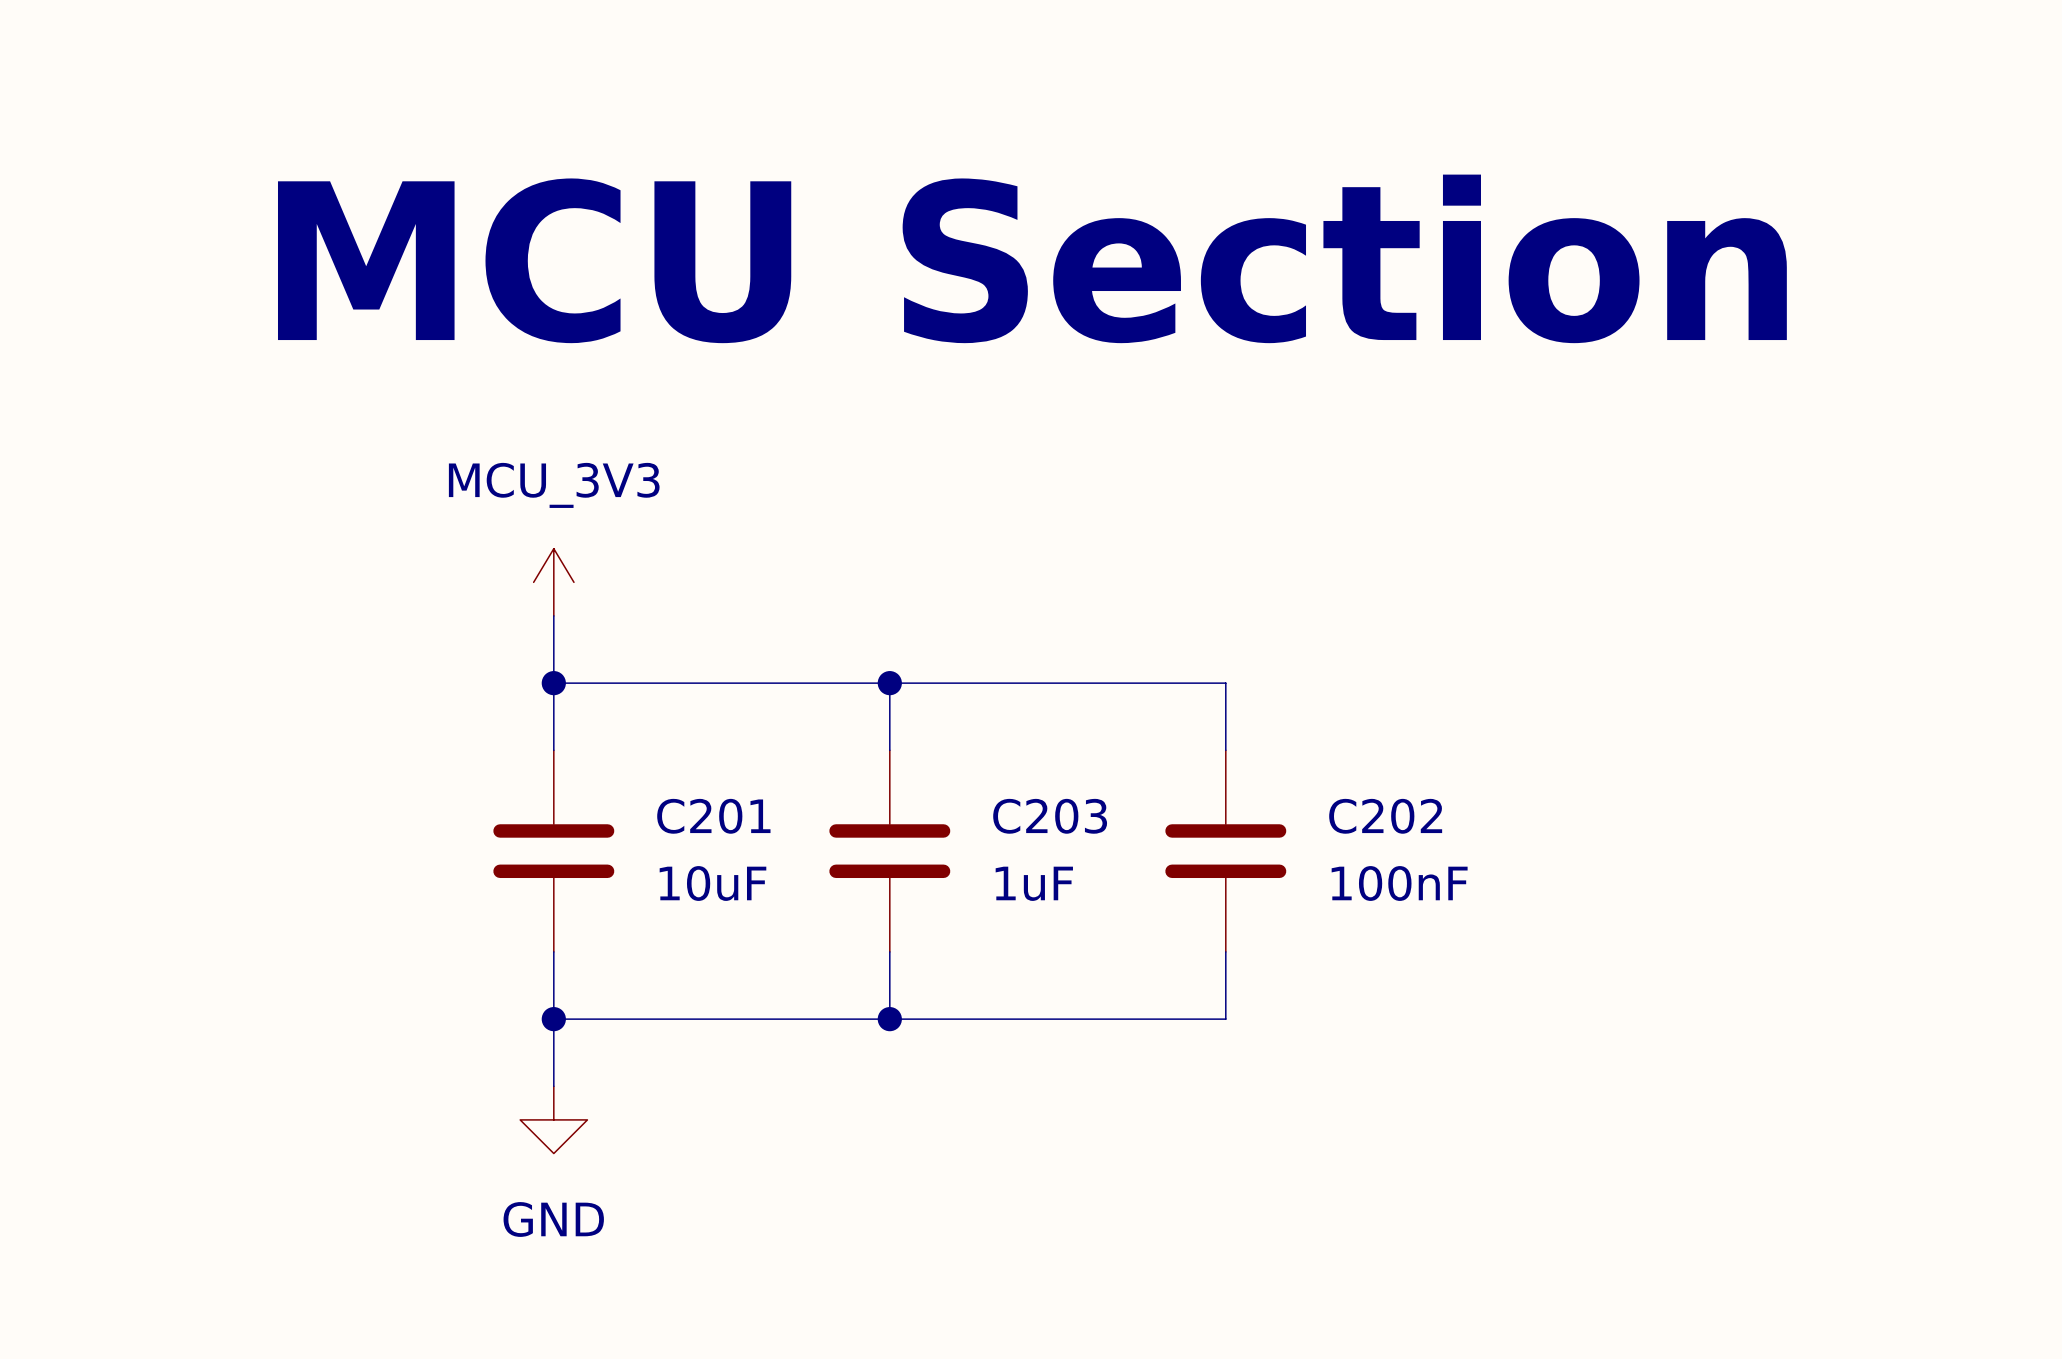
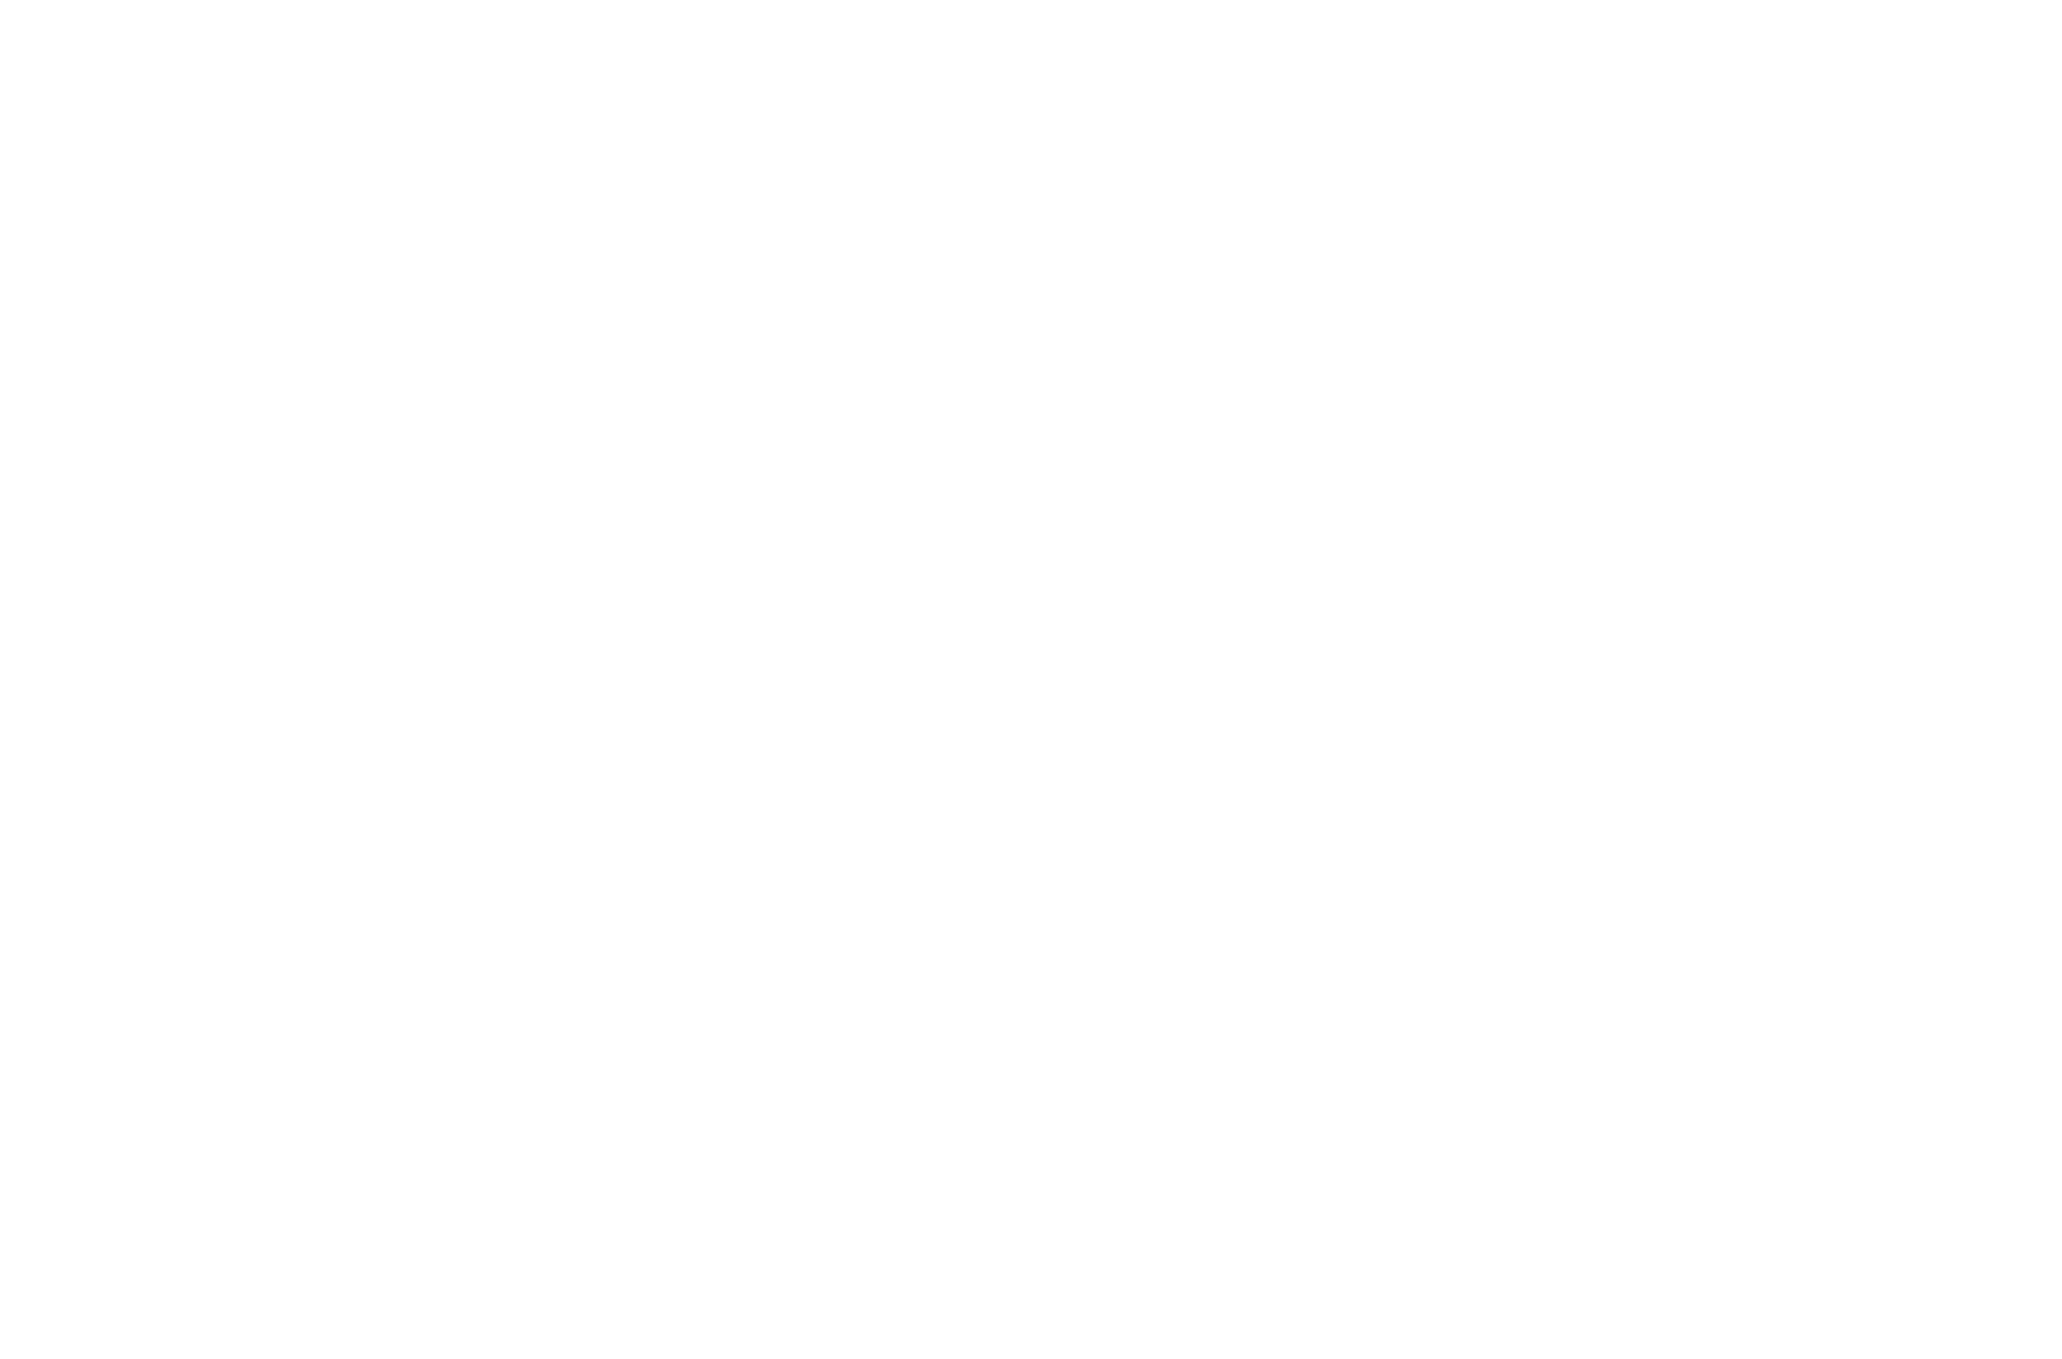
text: MCU Section (1032, 258) -> none
power symbol: MCU_3V3 (553, 582) -> none
wire: (553, 615) (553, 750) -> none
wire: (553, 683) (1225, 683) (1225, 750) -> none
junction: (553, 683) -> none
wire: (889, 683) (889, 750) -> none
junction: (889, 683) -> none
C201: 10uF (553, 851) -> none
C203: 1uF (889, 851) -> none
C202: 100nF (1225, 851) -> none
wire: (553, 951) (553, 1086) -> none
wire: (889, 951) (889, 1019) -> none
wire: (1225, 951) (1225, 1019) (553, 1019) -> none
junction: (553, 1019) -> none
junction: (889, 1019) -> none
power symbol: GND (553, 1119) -> none

